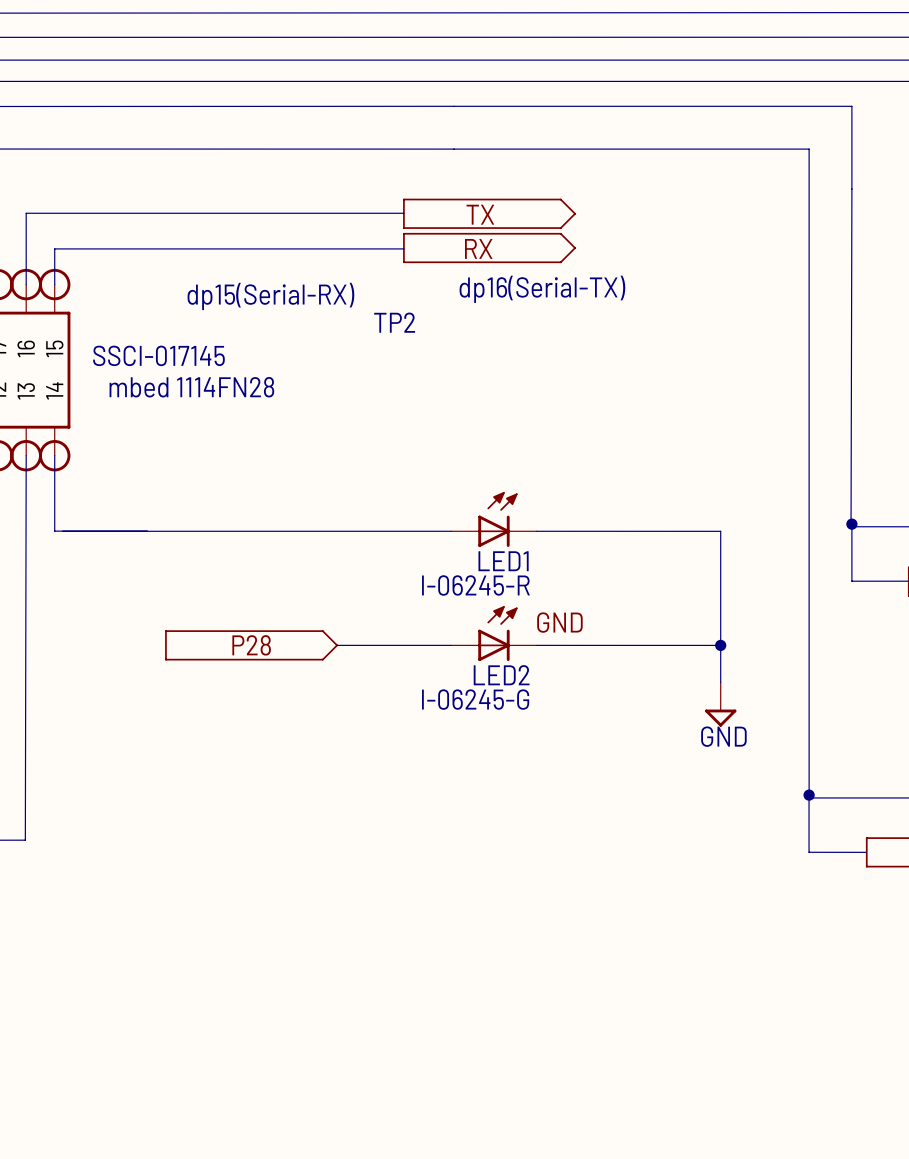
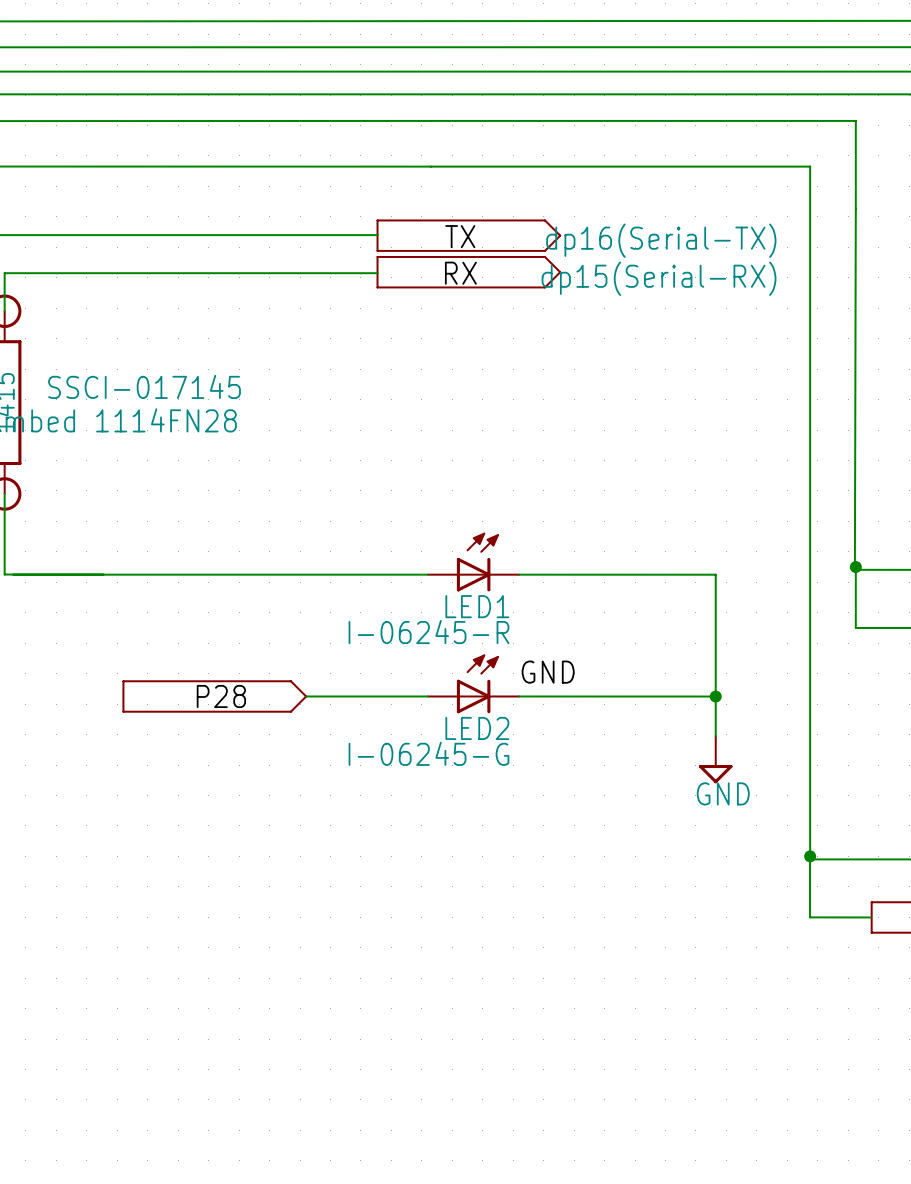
text: none -> dp15(Serial-RX) (659, 278)
text position: dp16(Serial-TX) (542, 289) -> dp16(Serial-TX) (661, 240)
text: dp15(Serial-RX) (270, 296) -> none
text: TP2 (394, 322) -> none

